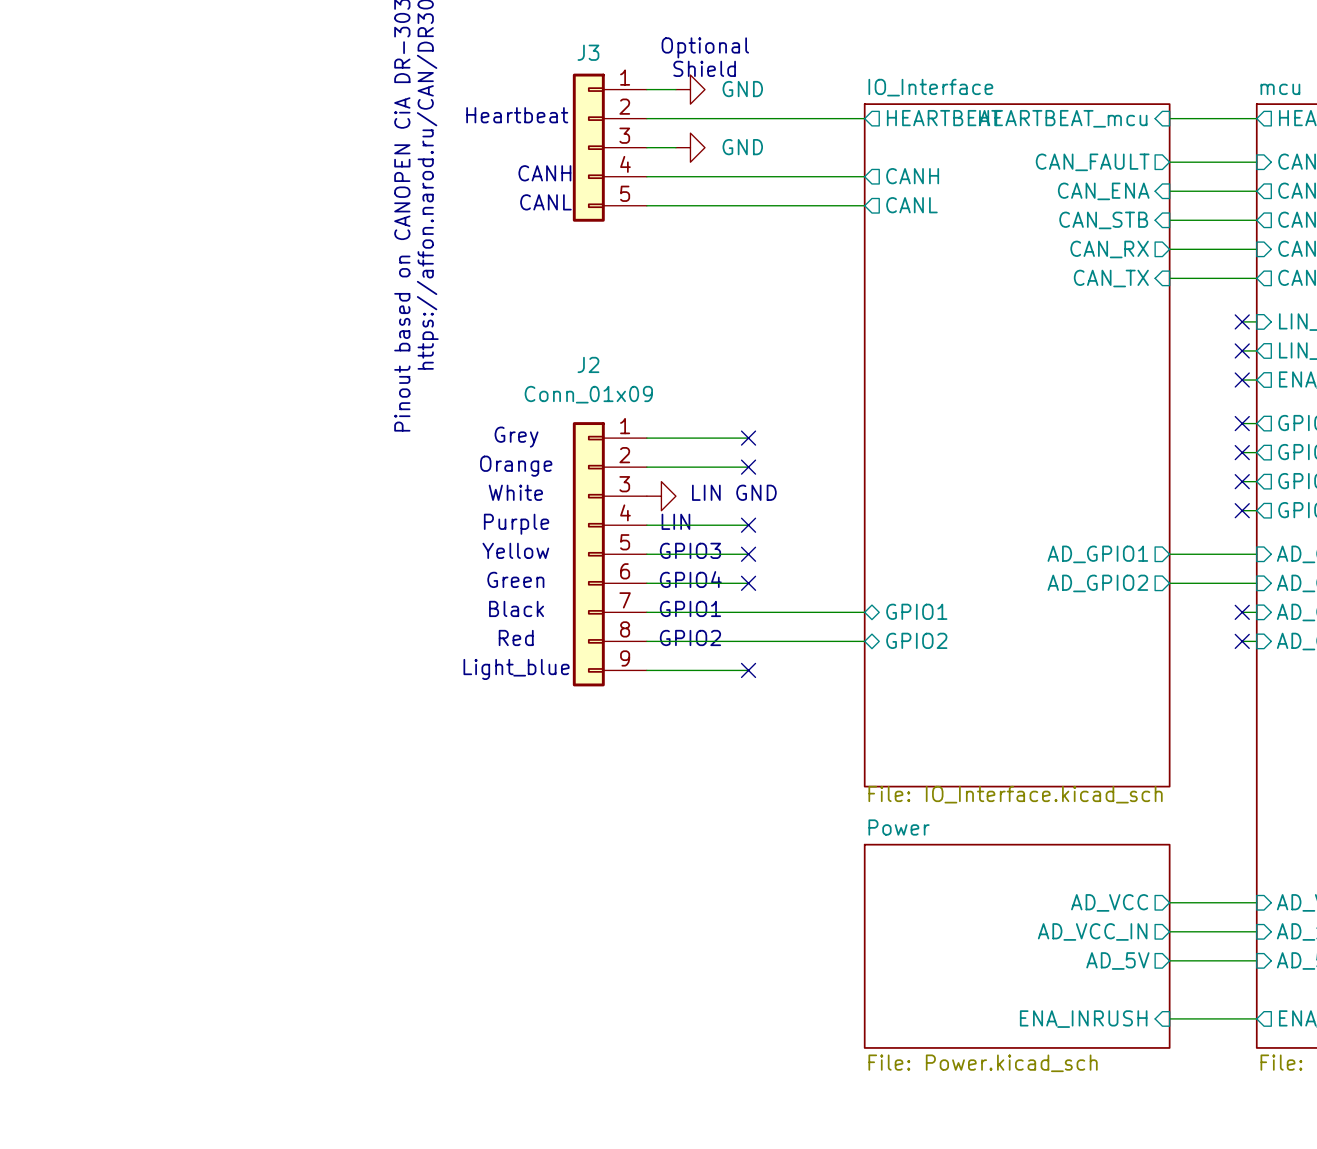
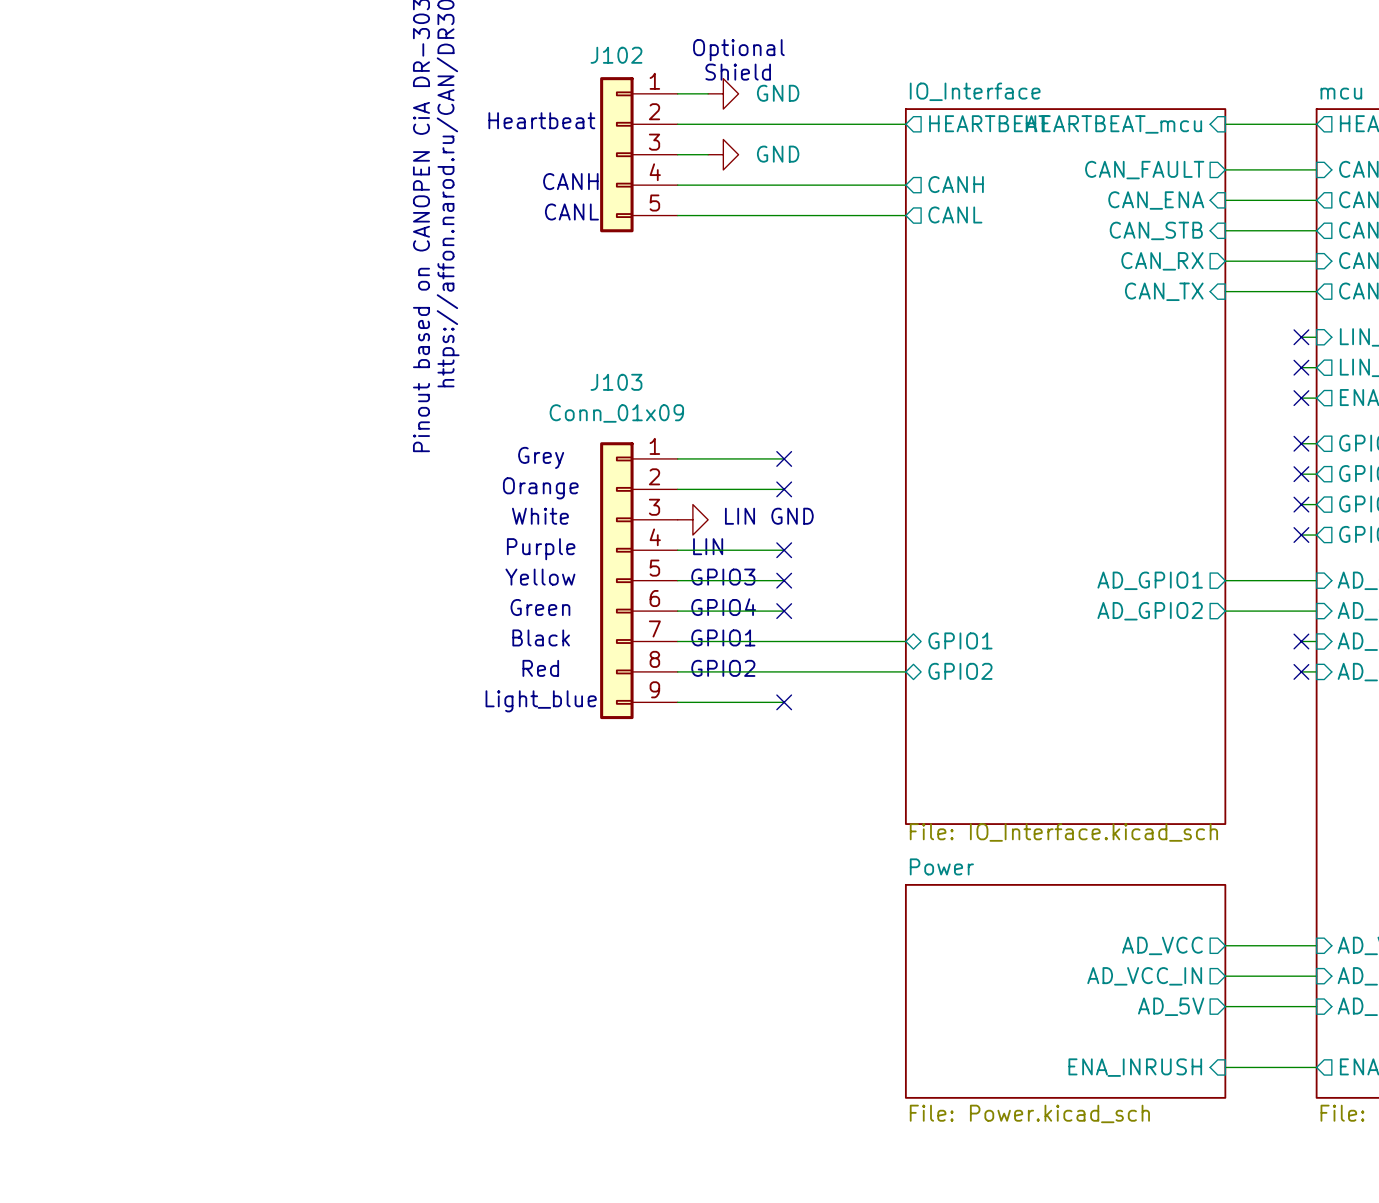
J3 name: J3 (588, 52) -> J102 (616, 55)
J2 name: J2 (588, 364) -> J103 (616, 382)

